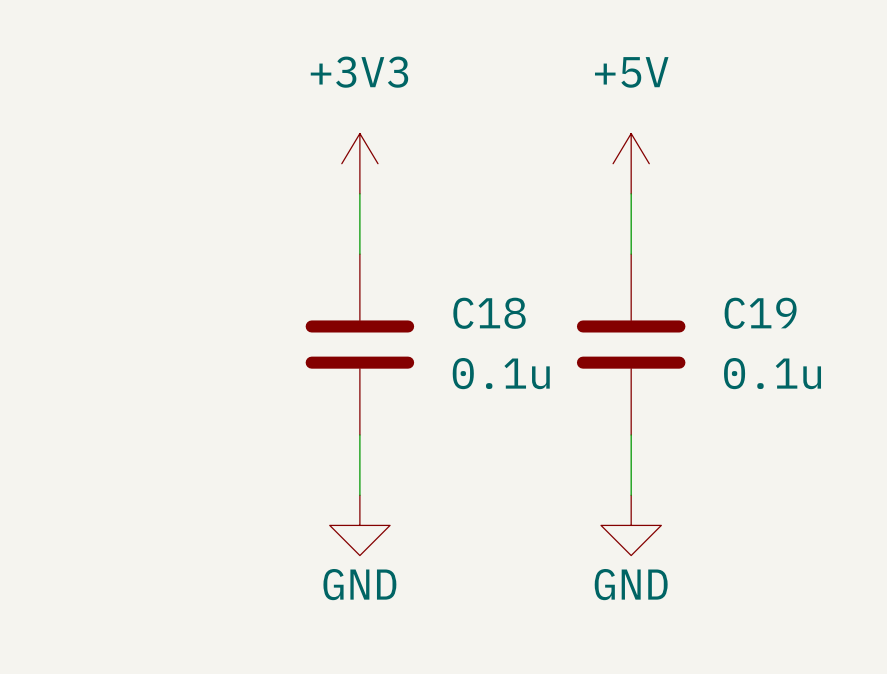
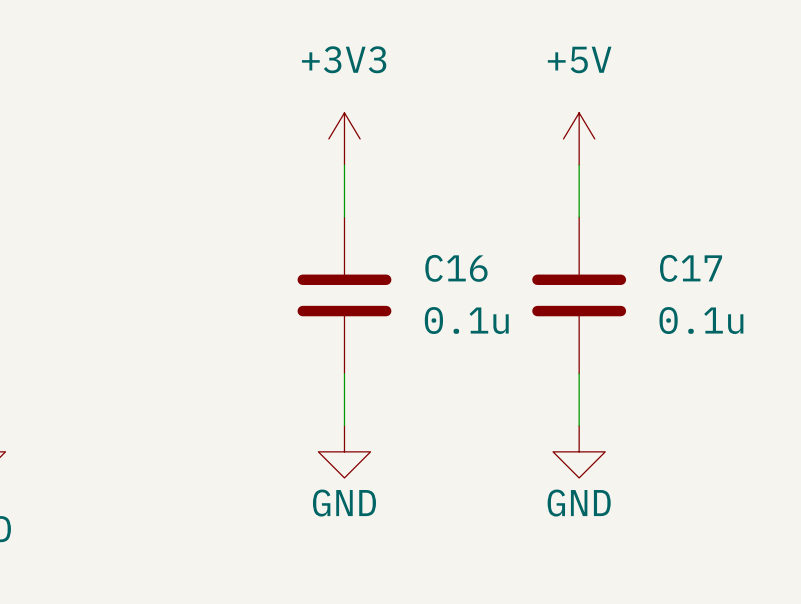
C18 name: C18 (489, 313) -> C16 (456, 268)
C19 name: C19 (760, 313) -> C17 (691, 268)

